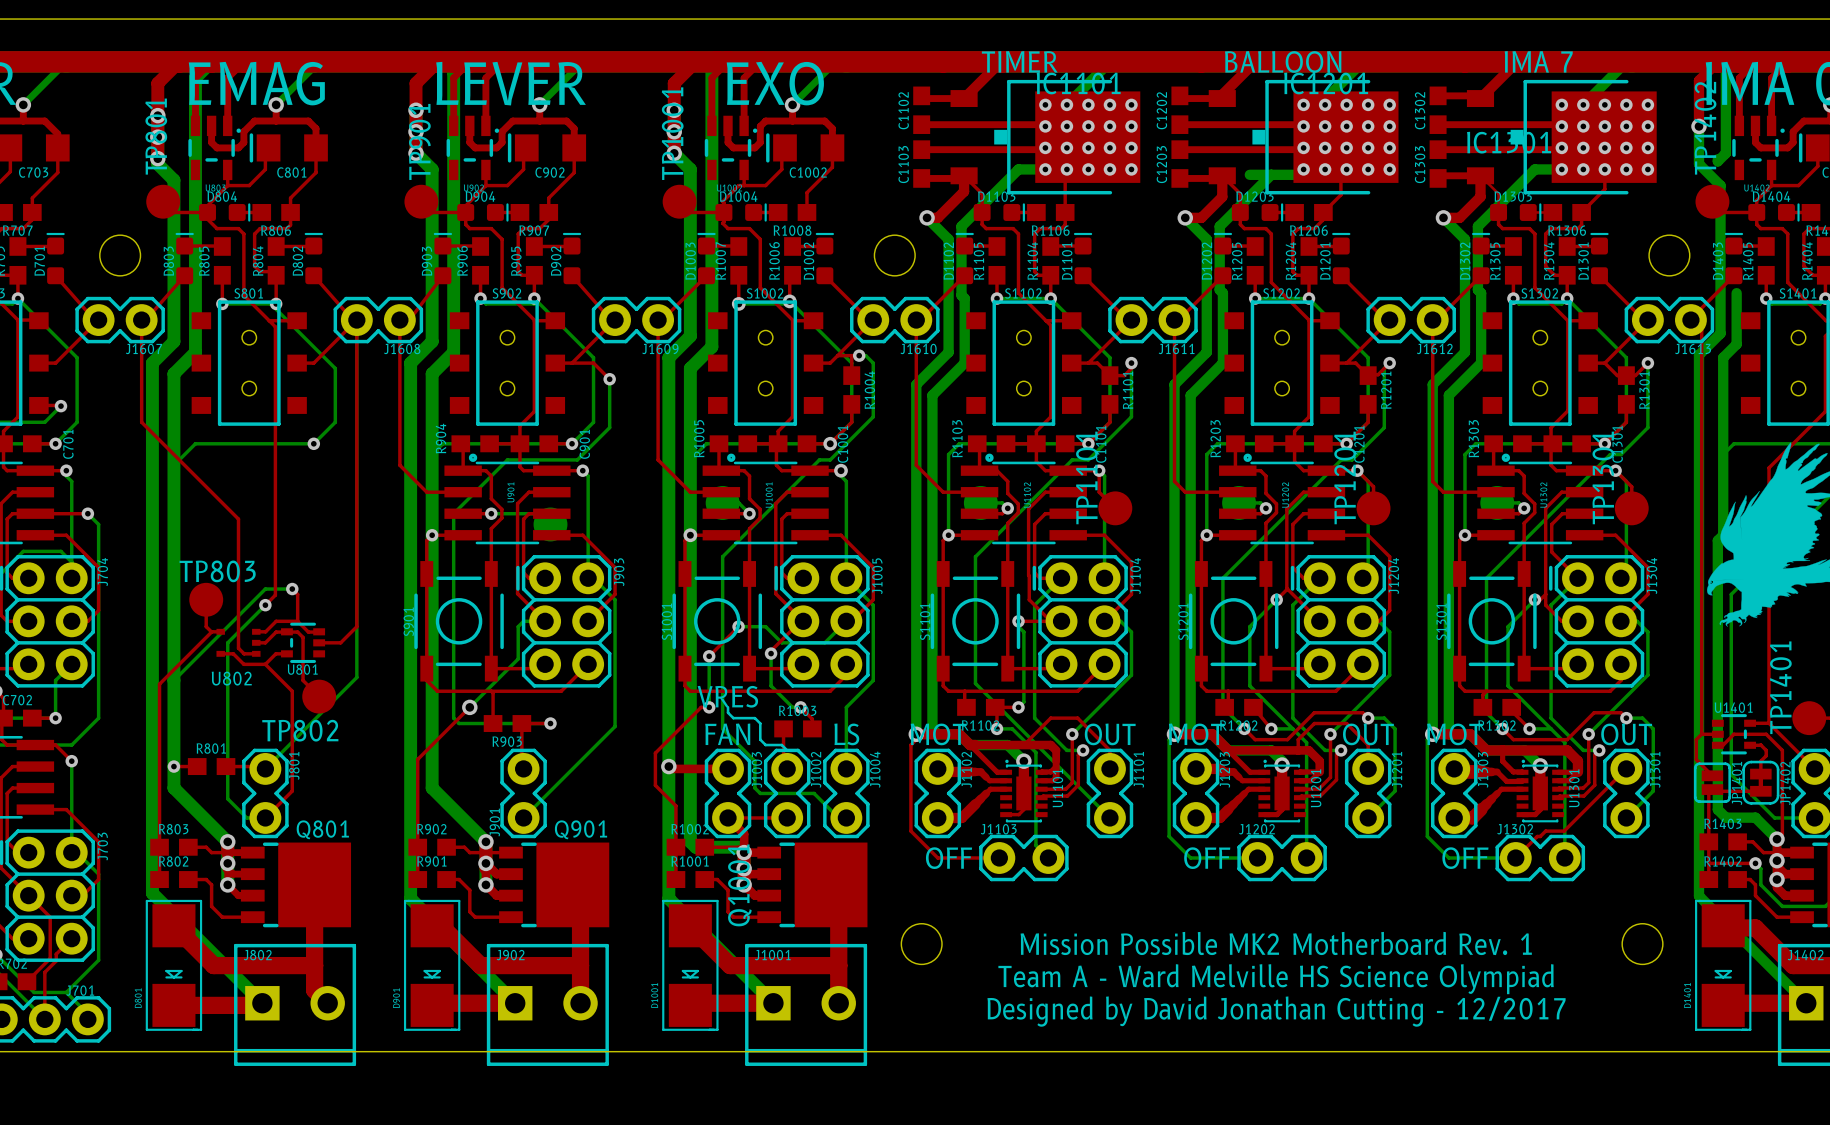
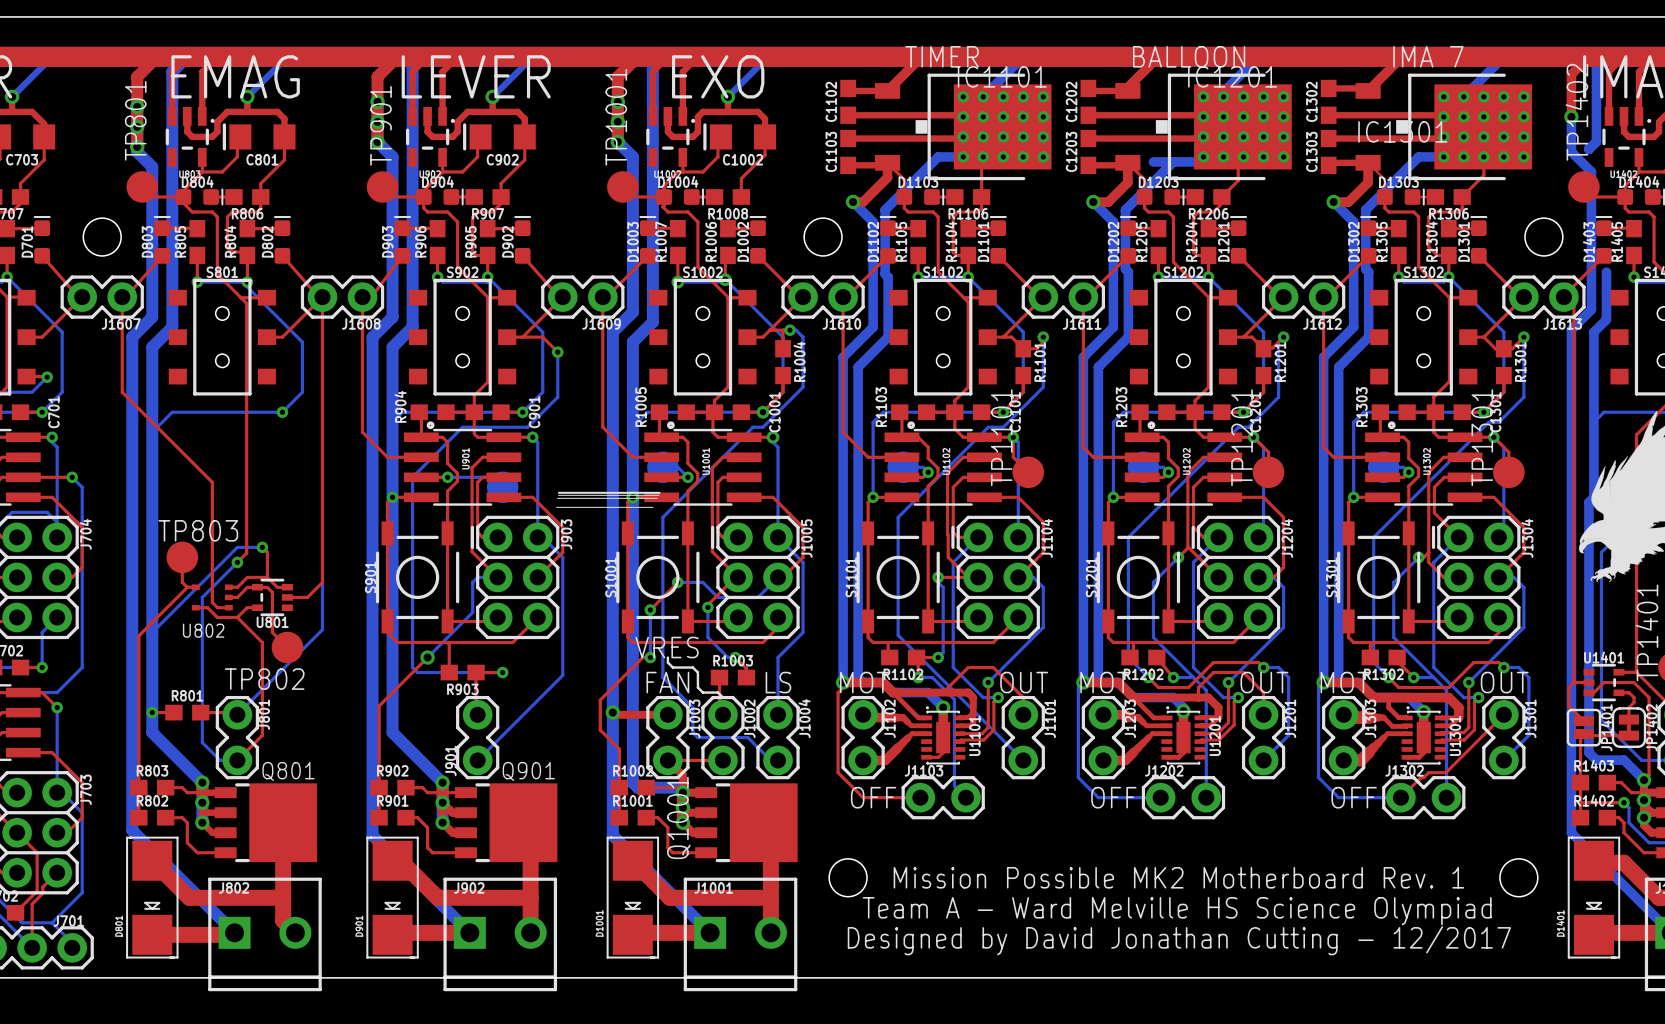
drawing: none -> [556, 491, 661, 508]

